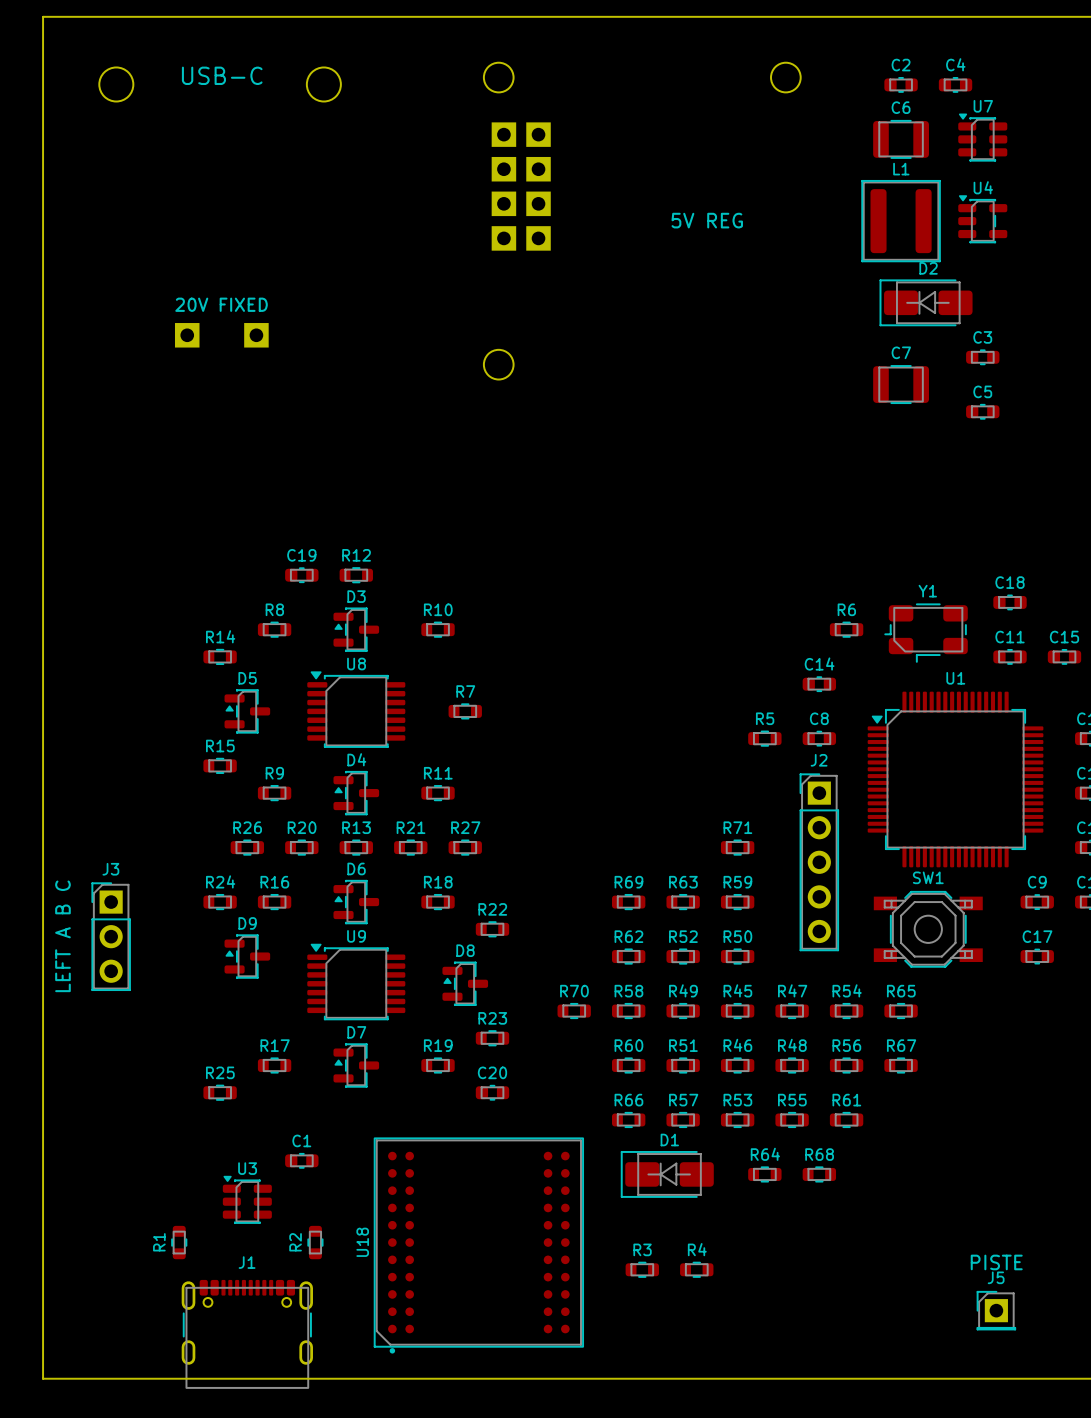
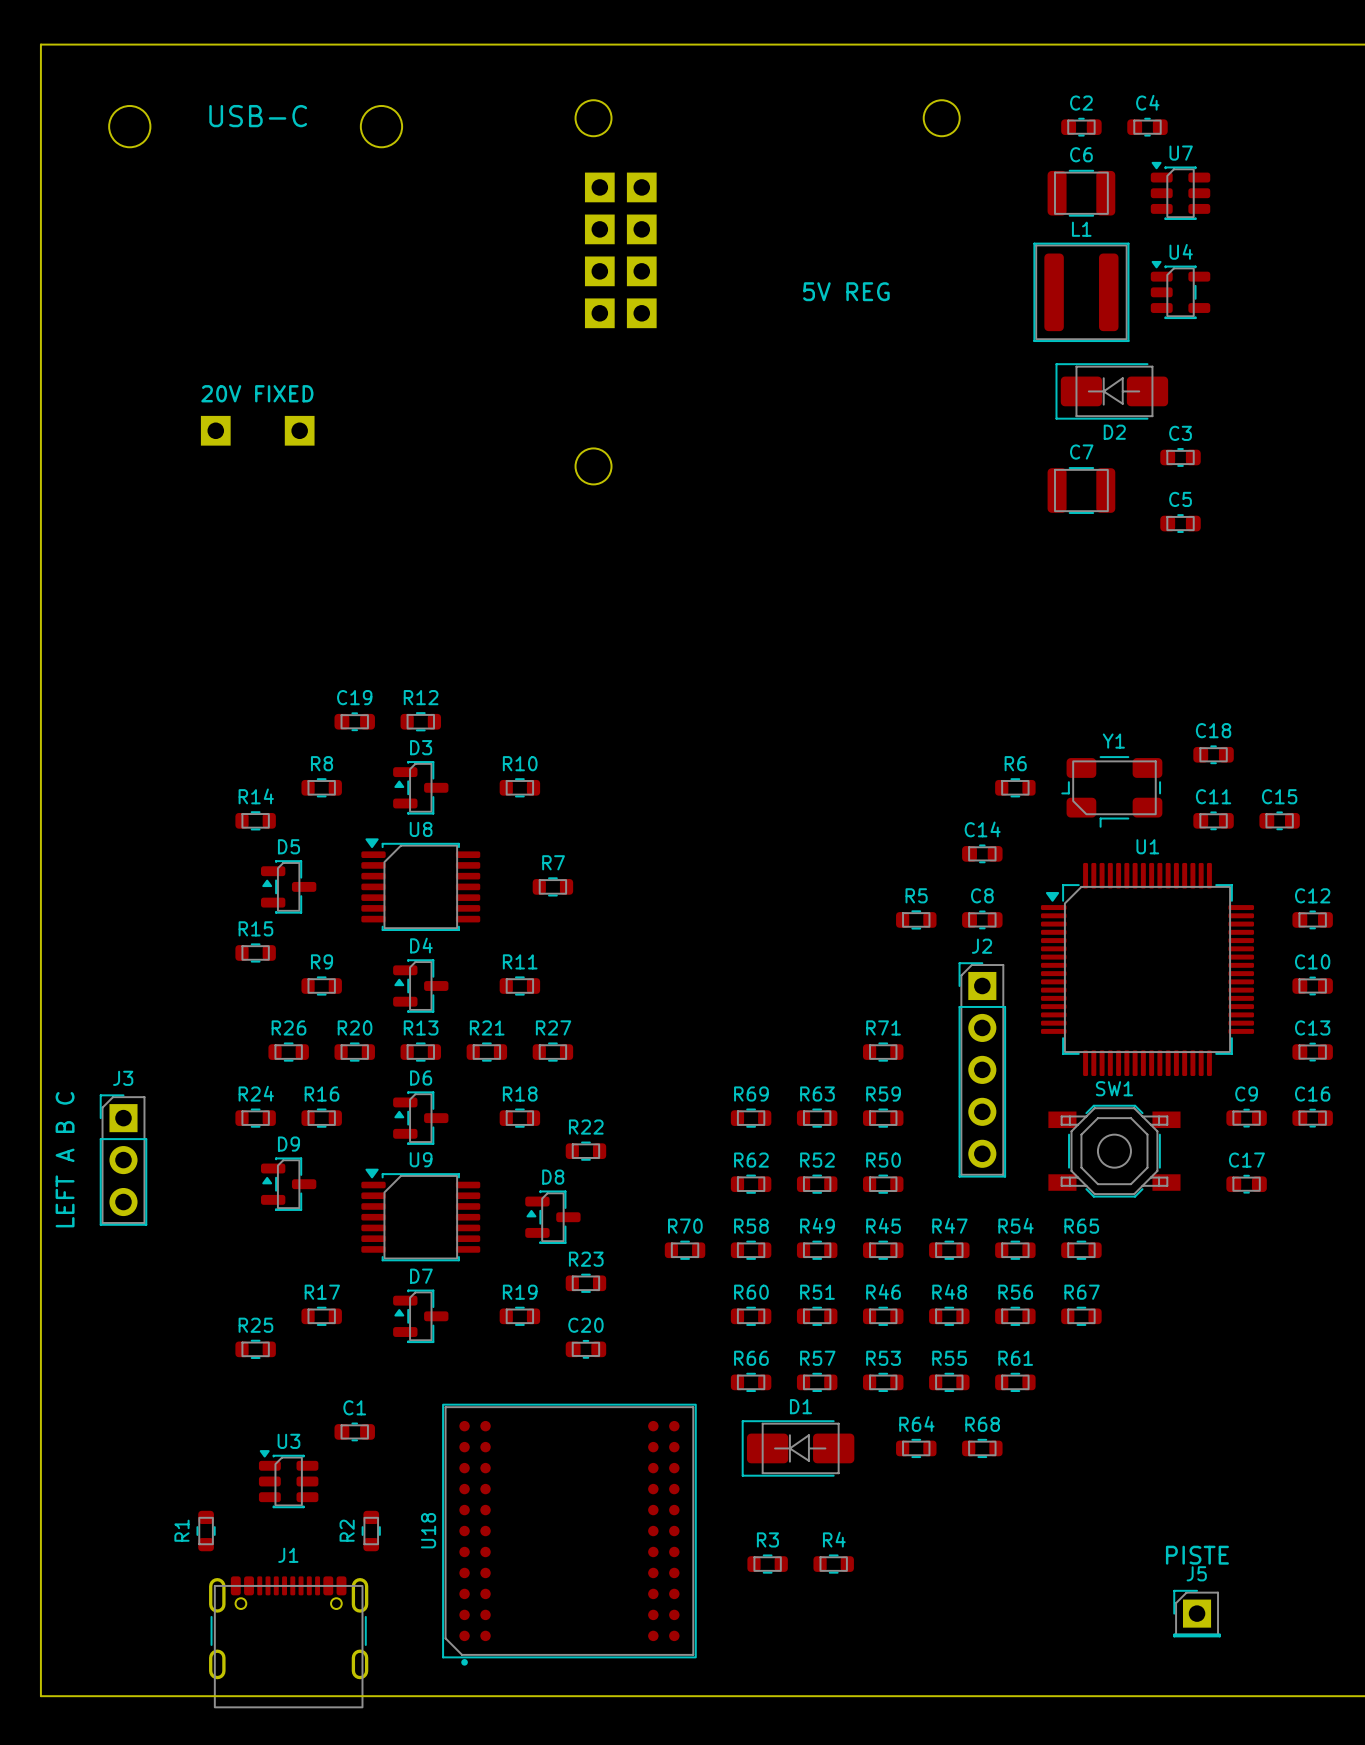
D2 name position: D2 (928, 268) -> D2 (1114, 432)

